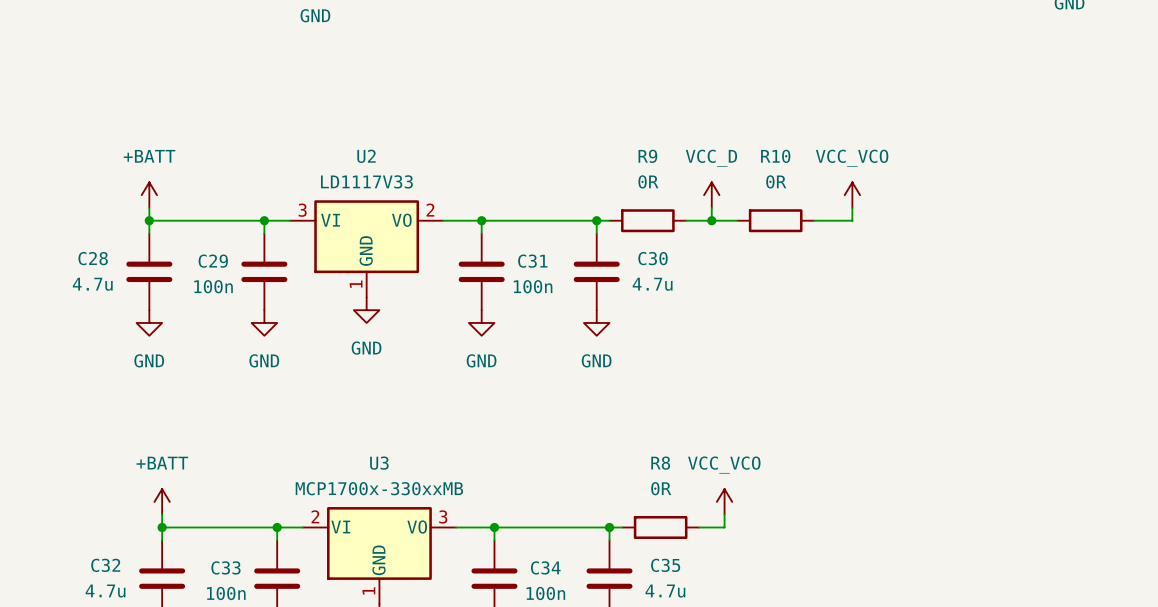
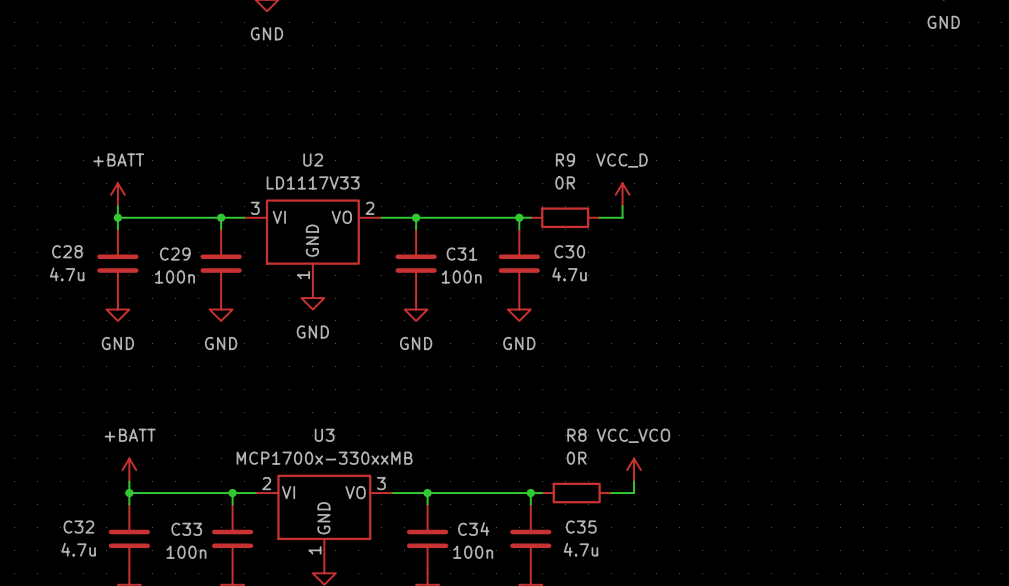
power symbol: VCC_VCO (852, 195) -> none
wire: (852, 207) (852, 220) (814, 220) -> none
wire: (711, 220) (737, 220) -> none
junction: (711, 220) -> none
R10: 0R (775, 220) -> none

